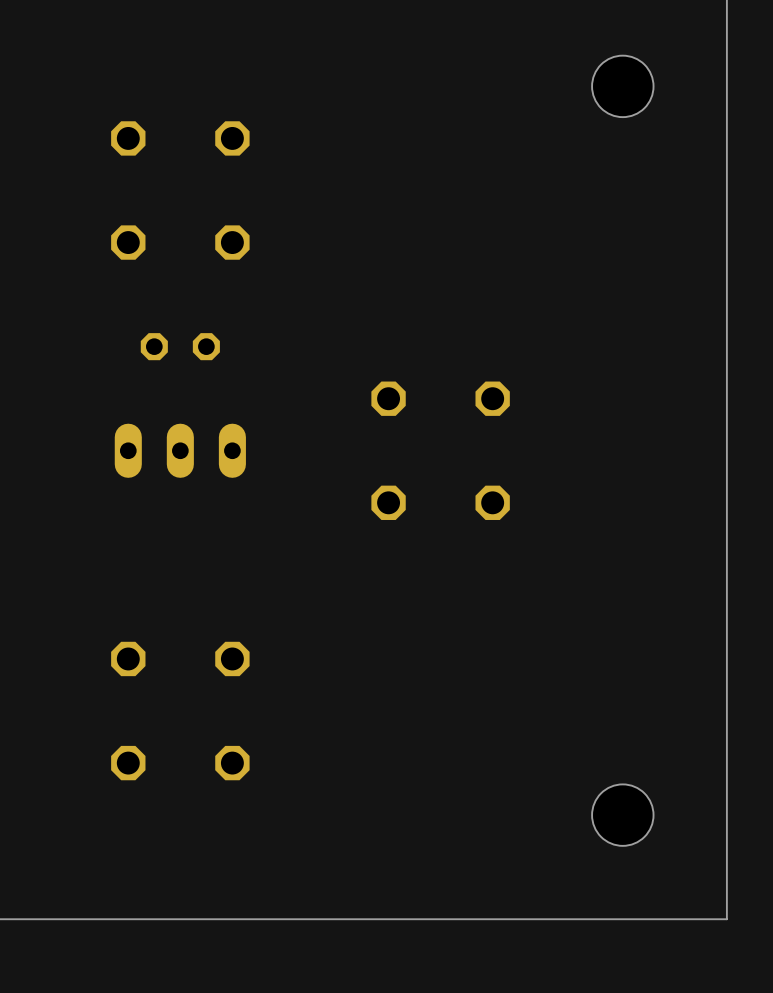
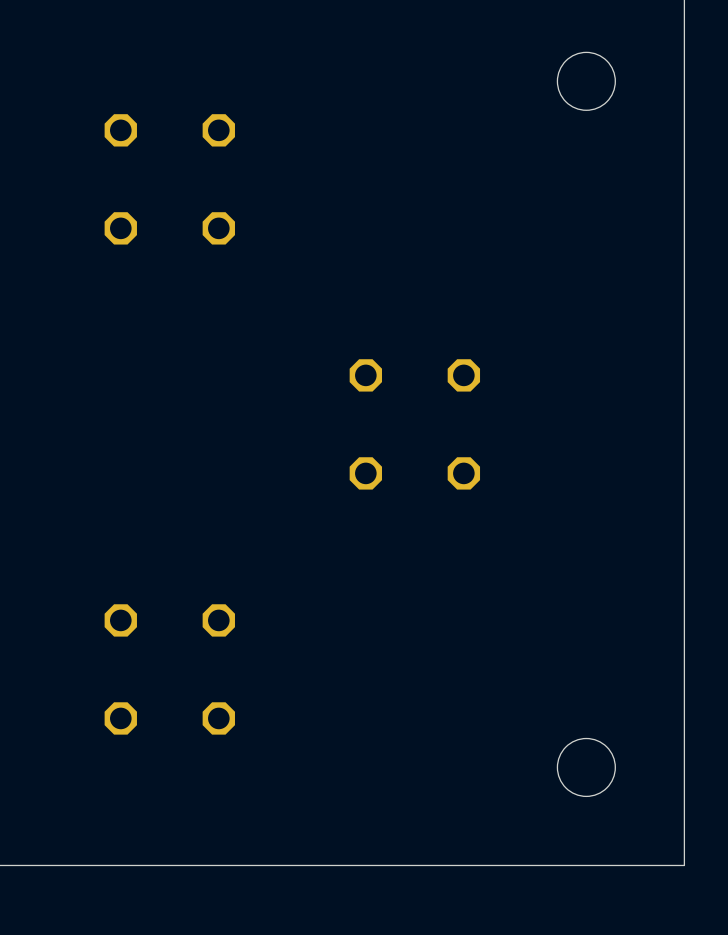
part: (180, 346) -> none
part: (180, 450) -> none

